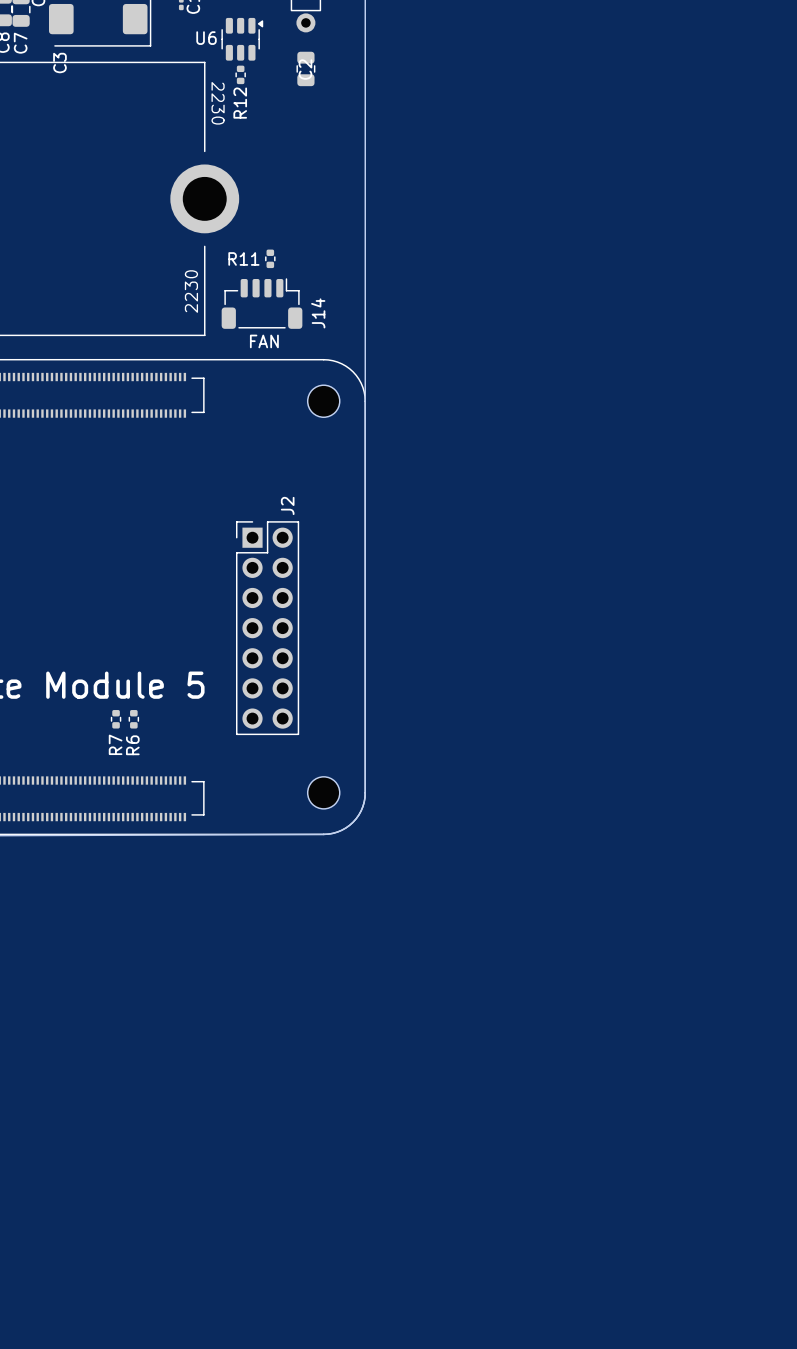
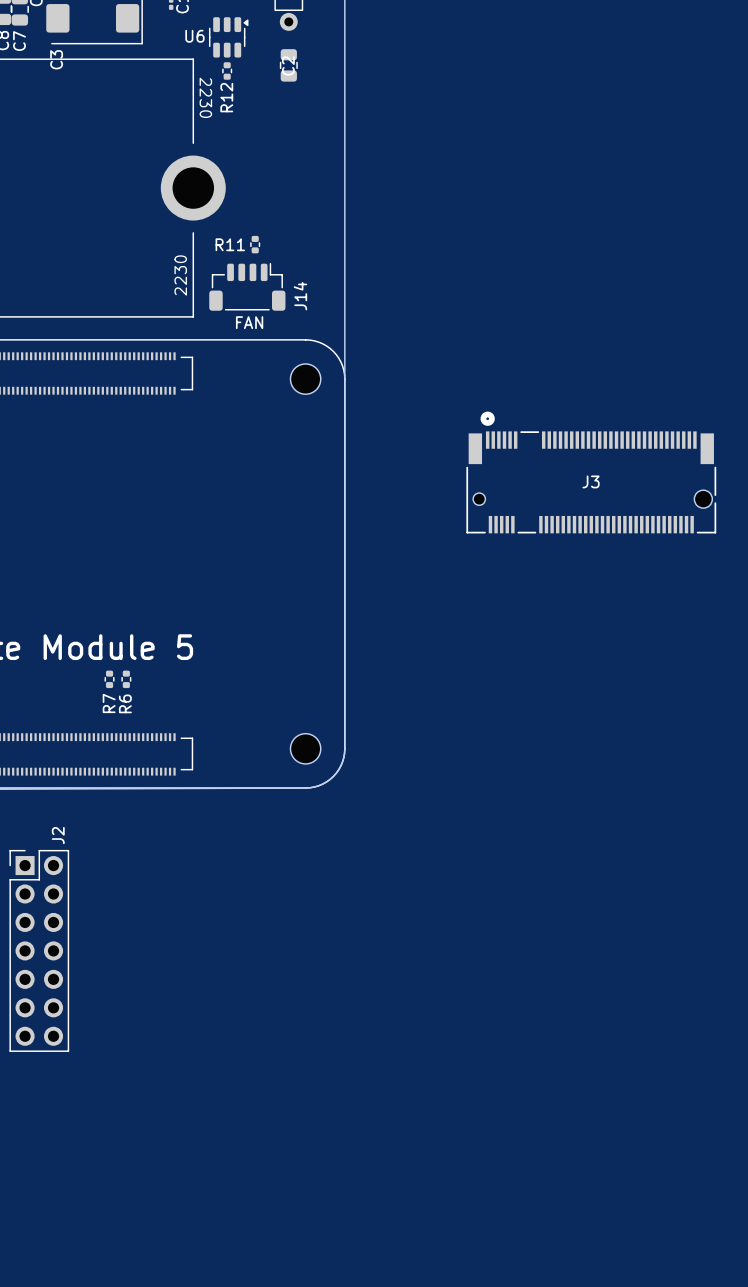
J3: none -> (591, 472)
J2 position: (267, 628) -> (39, 950)

